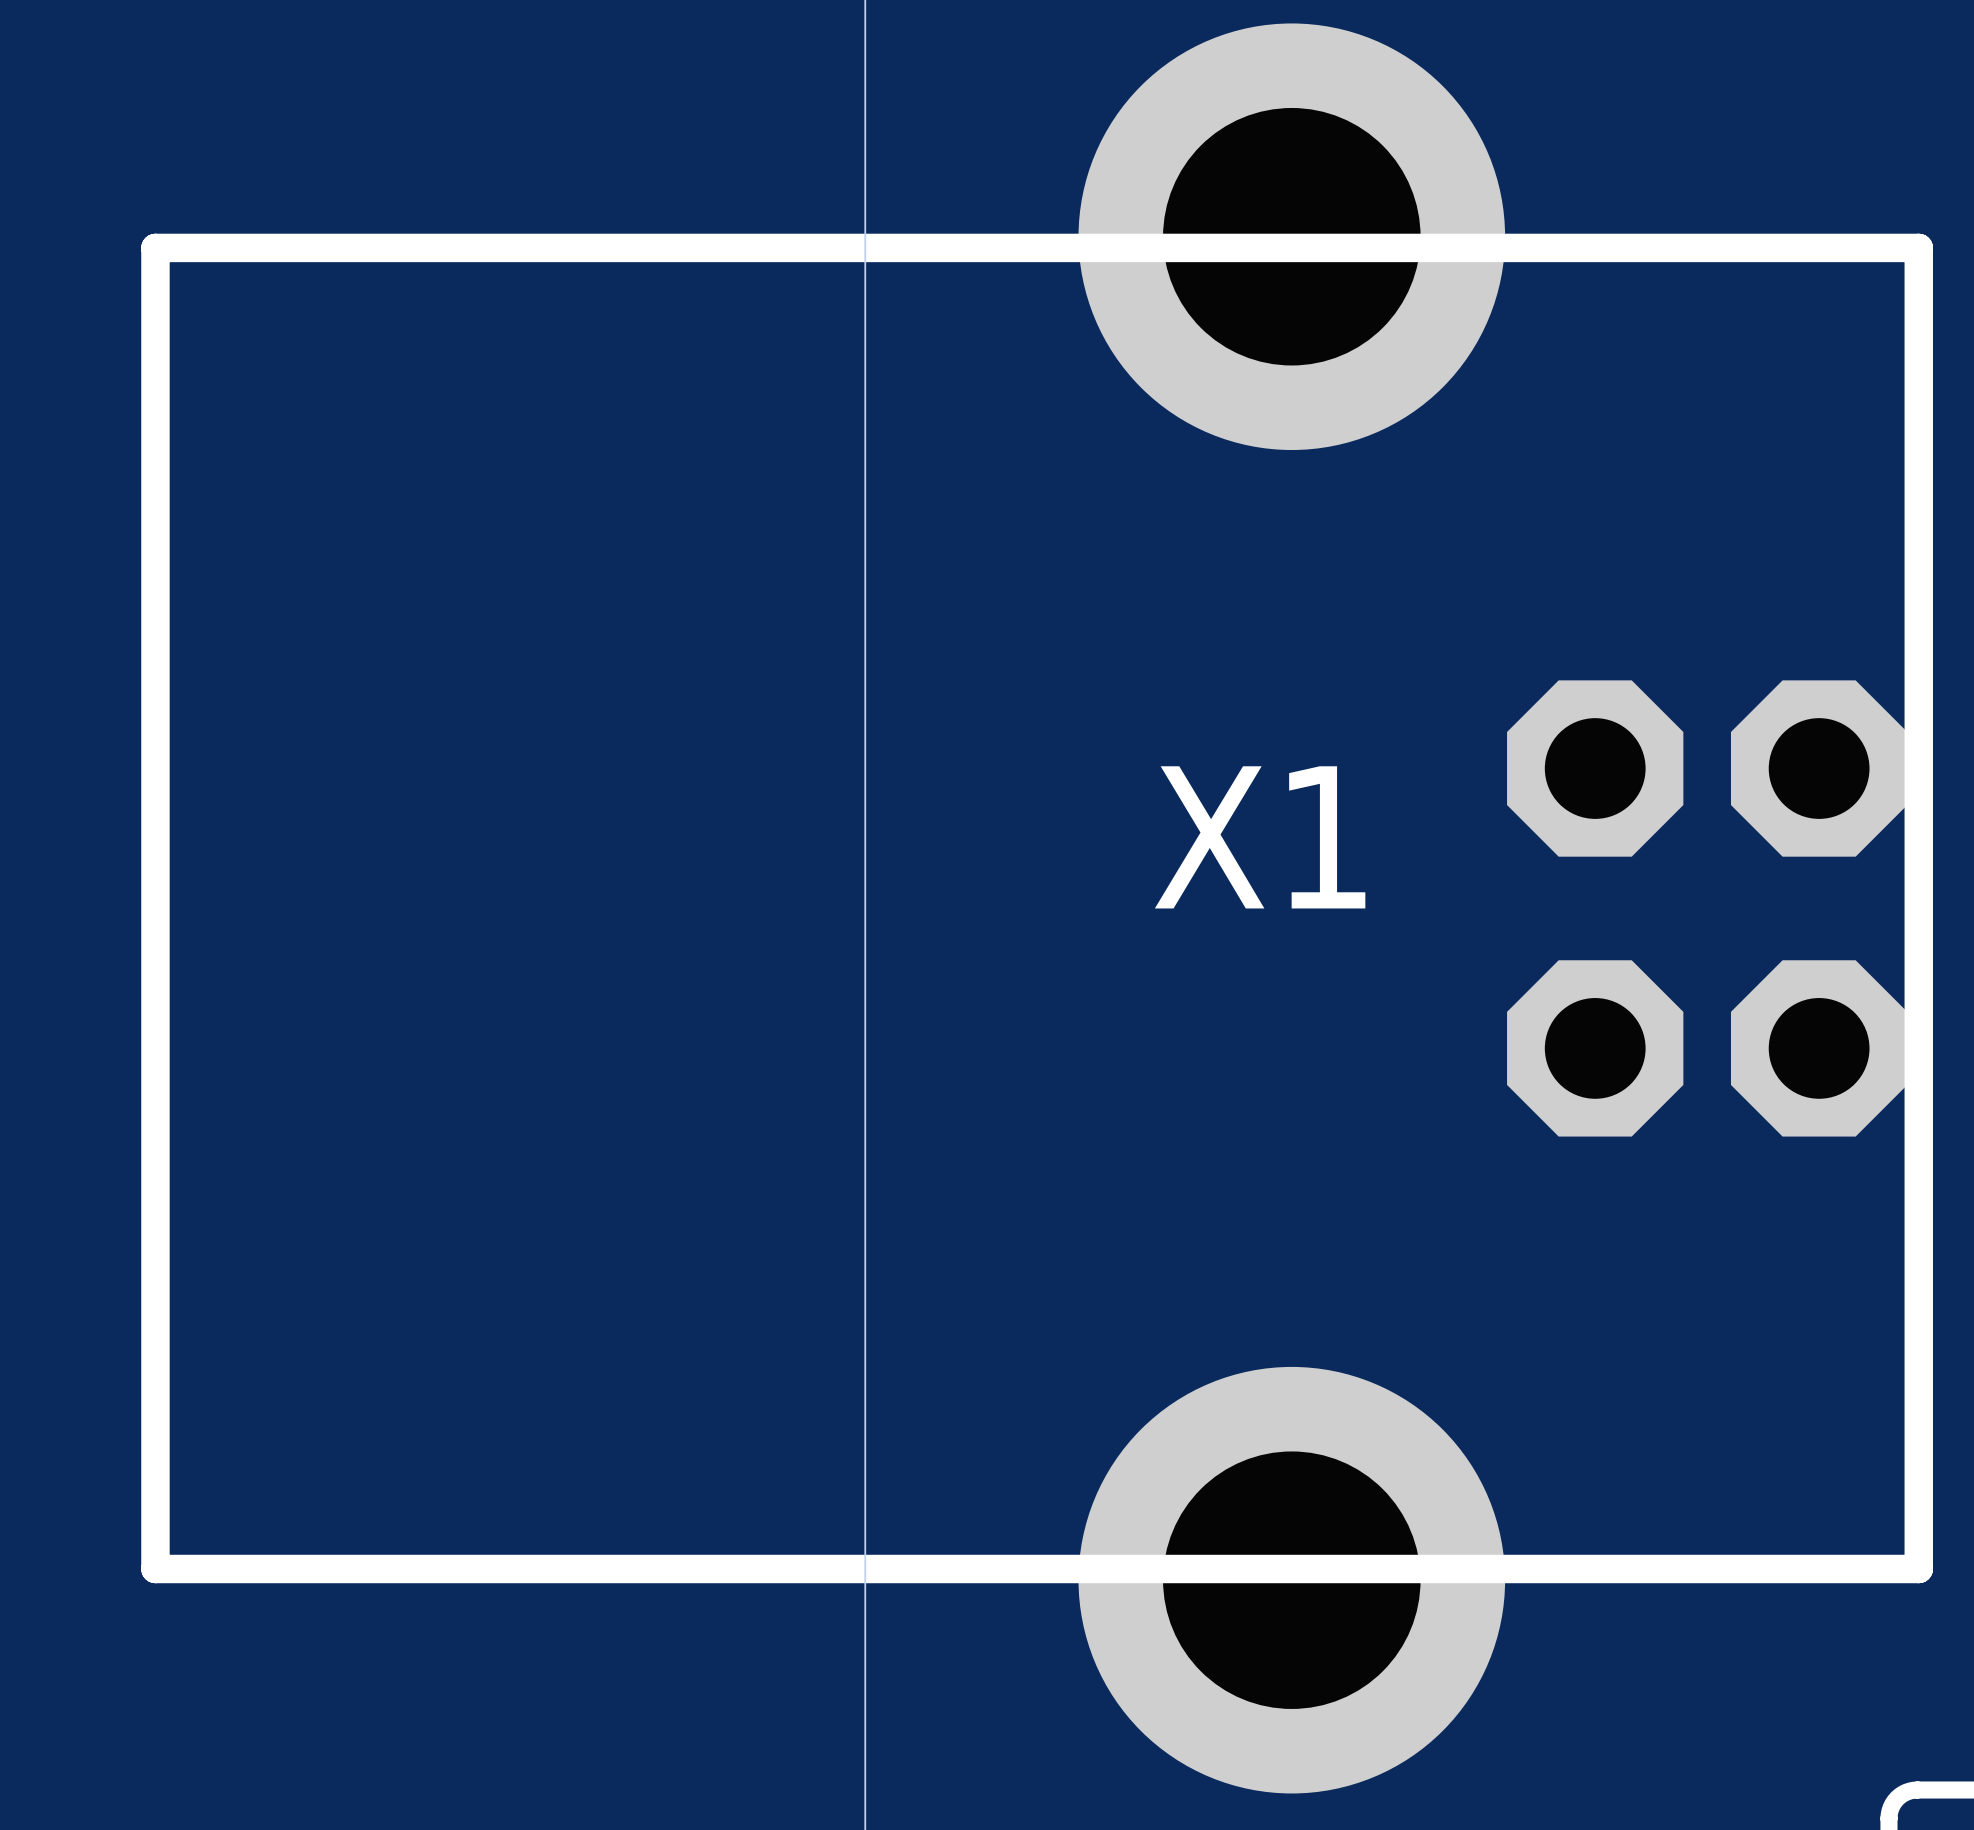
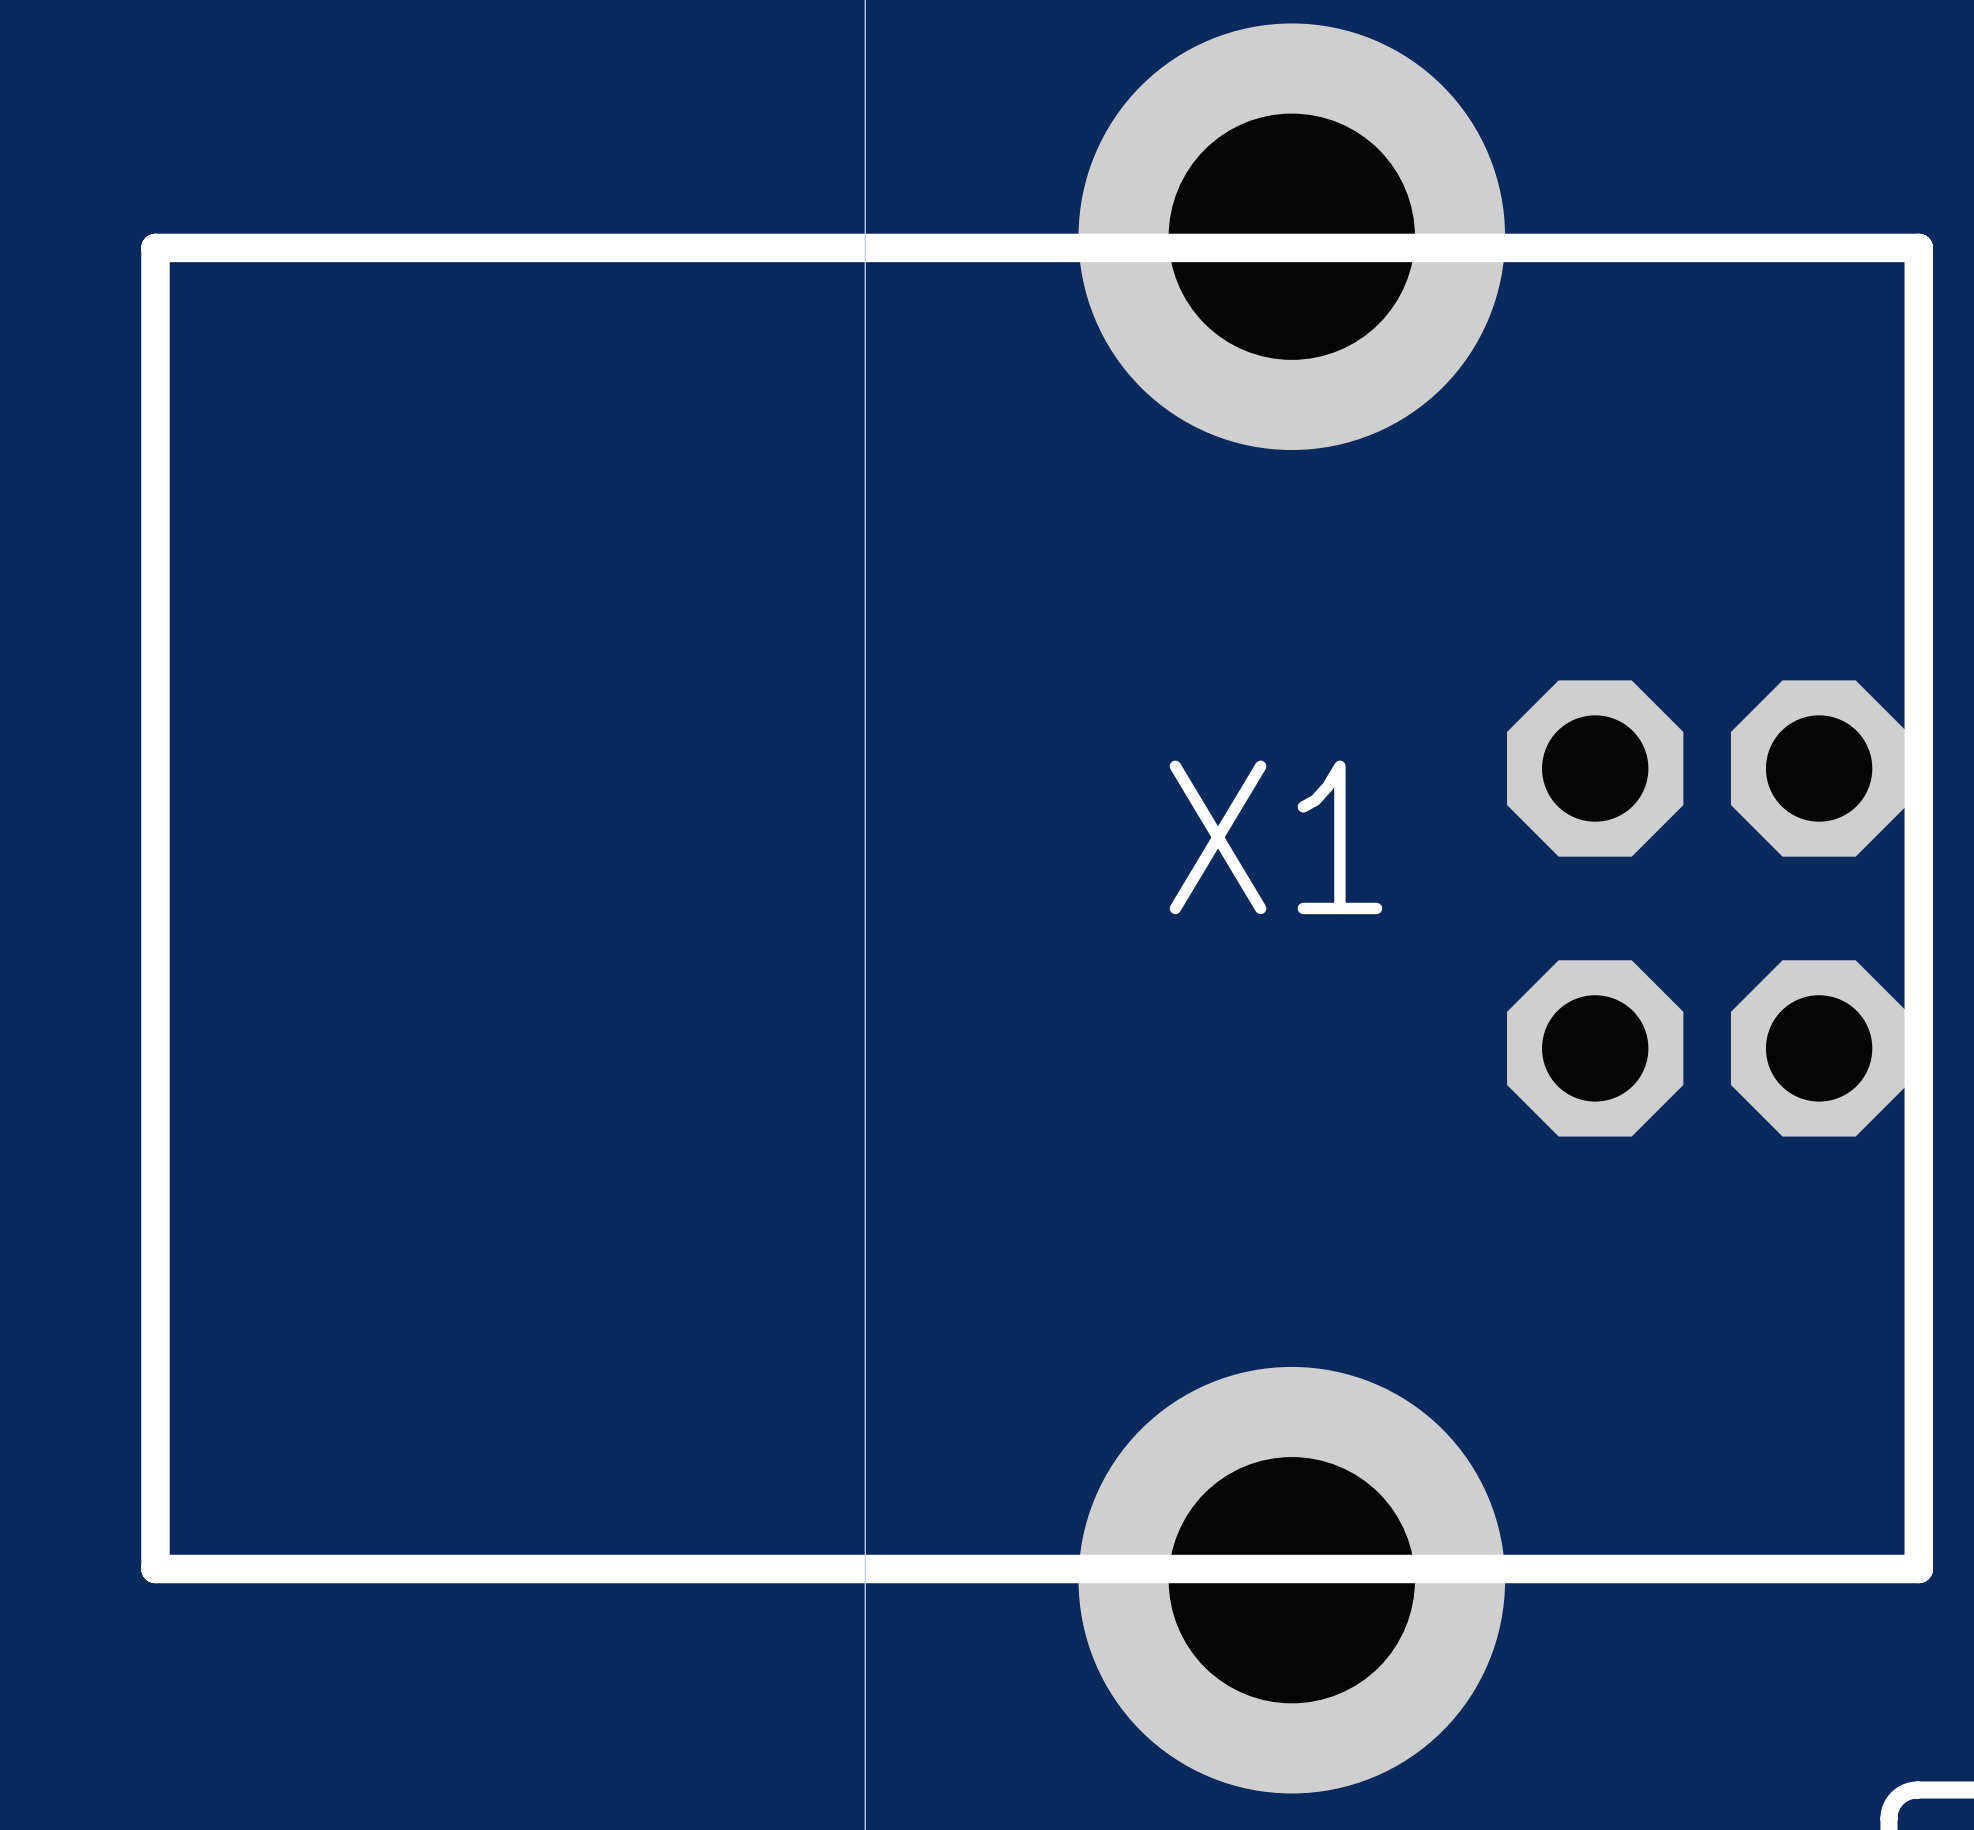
X1 footprint: [141, 23, 1933, 1794] -> [141, 23, 1933, 1794]

